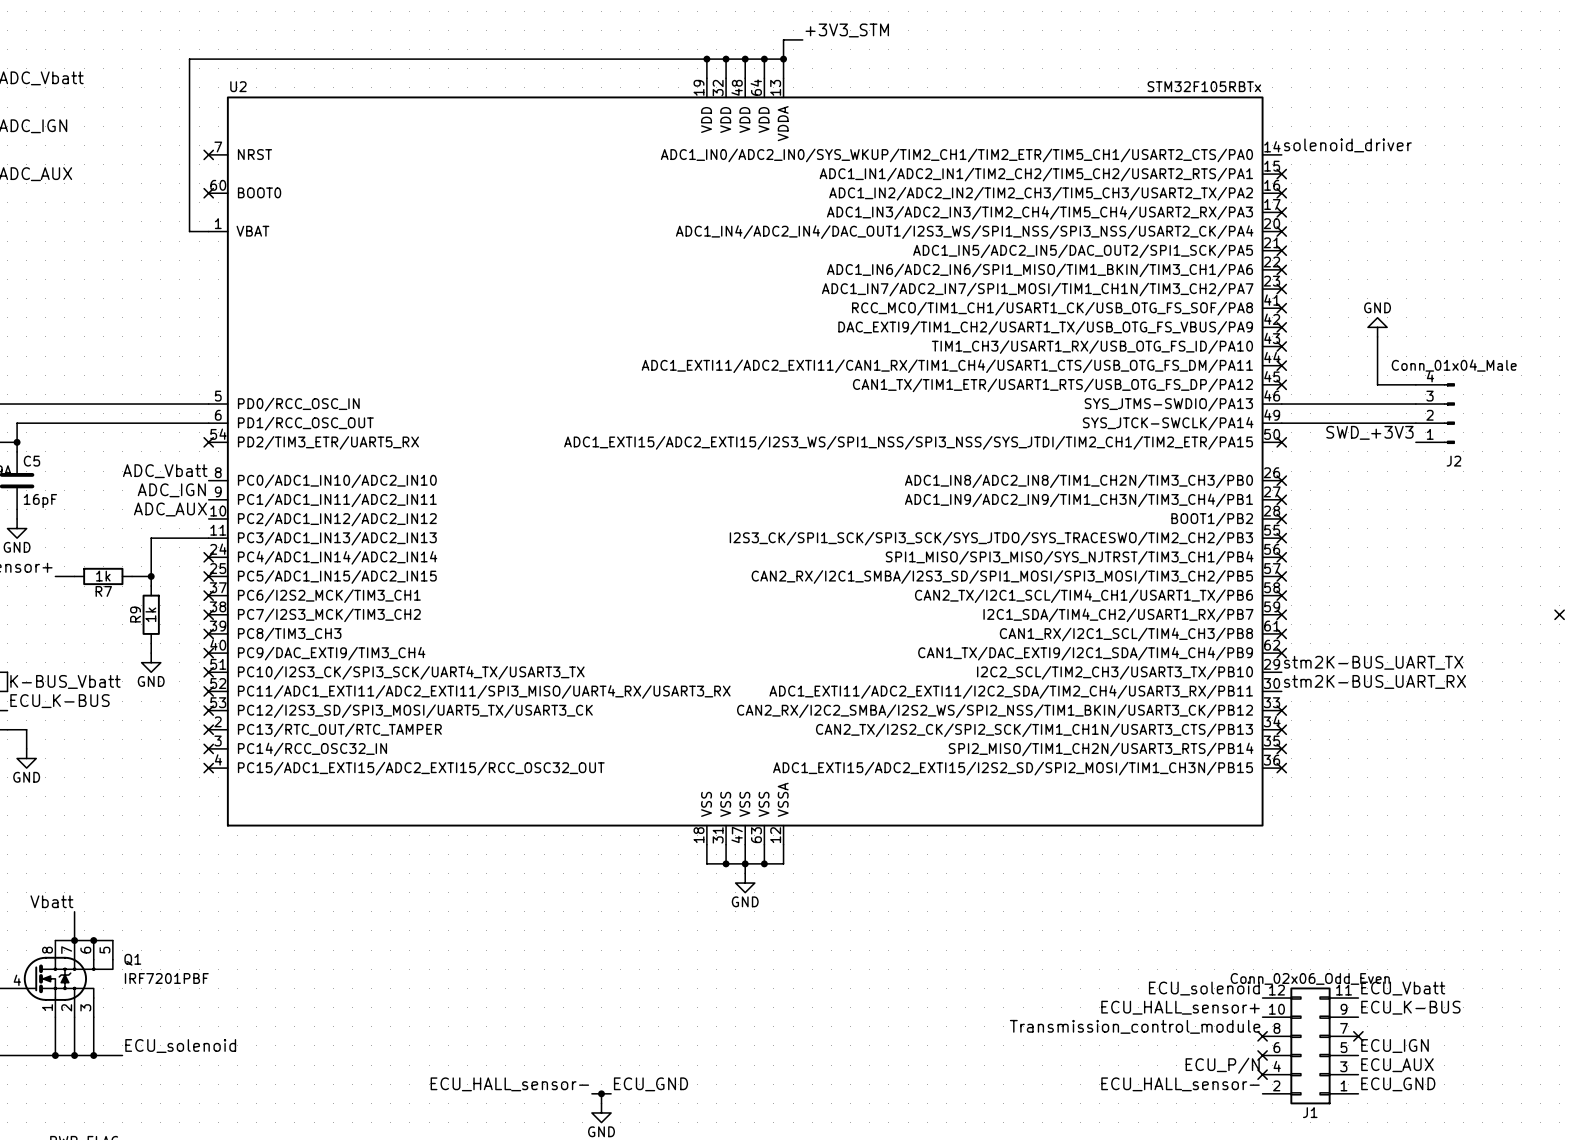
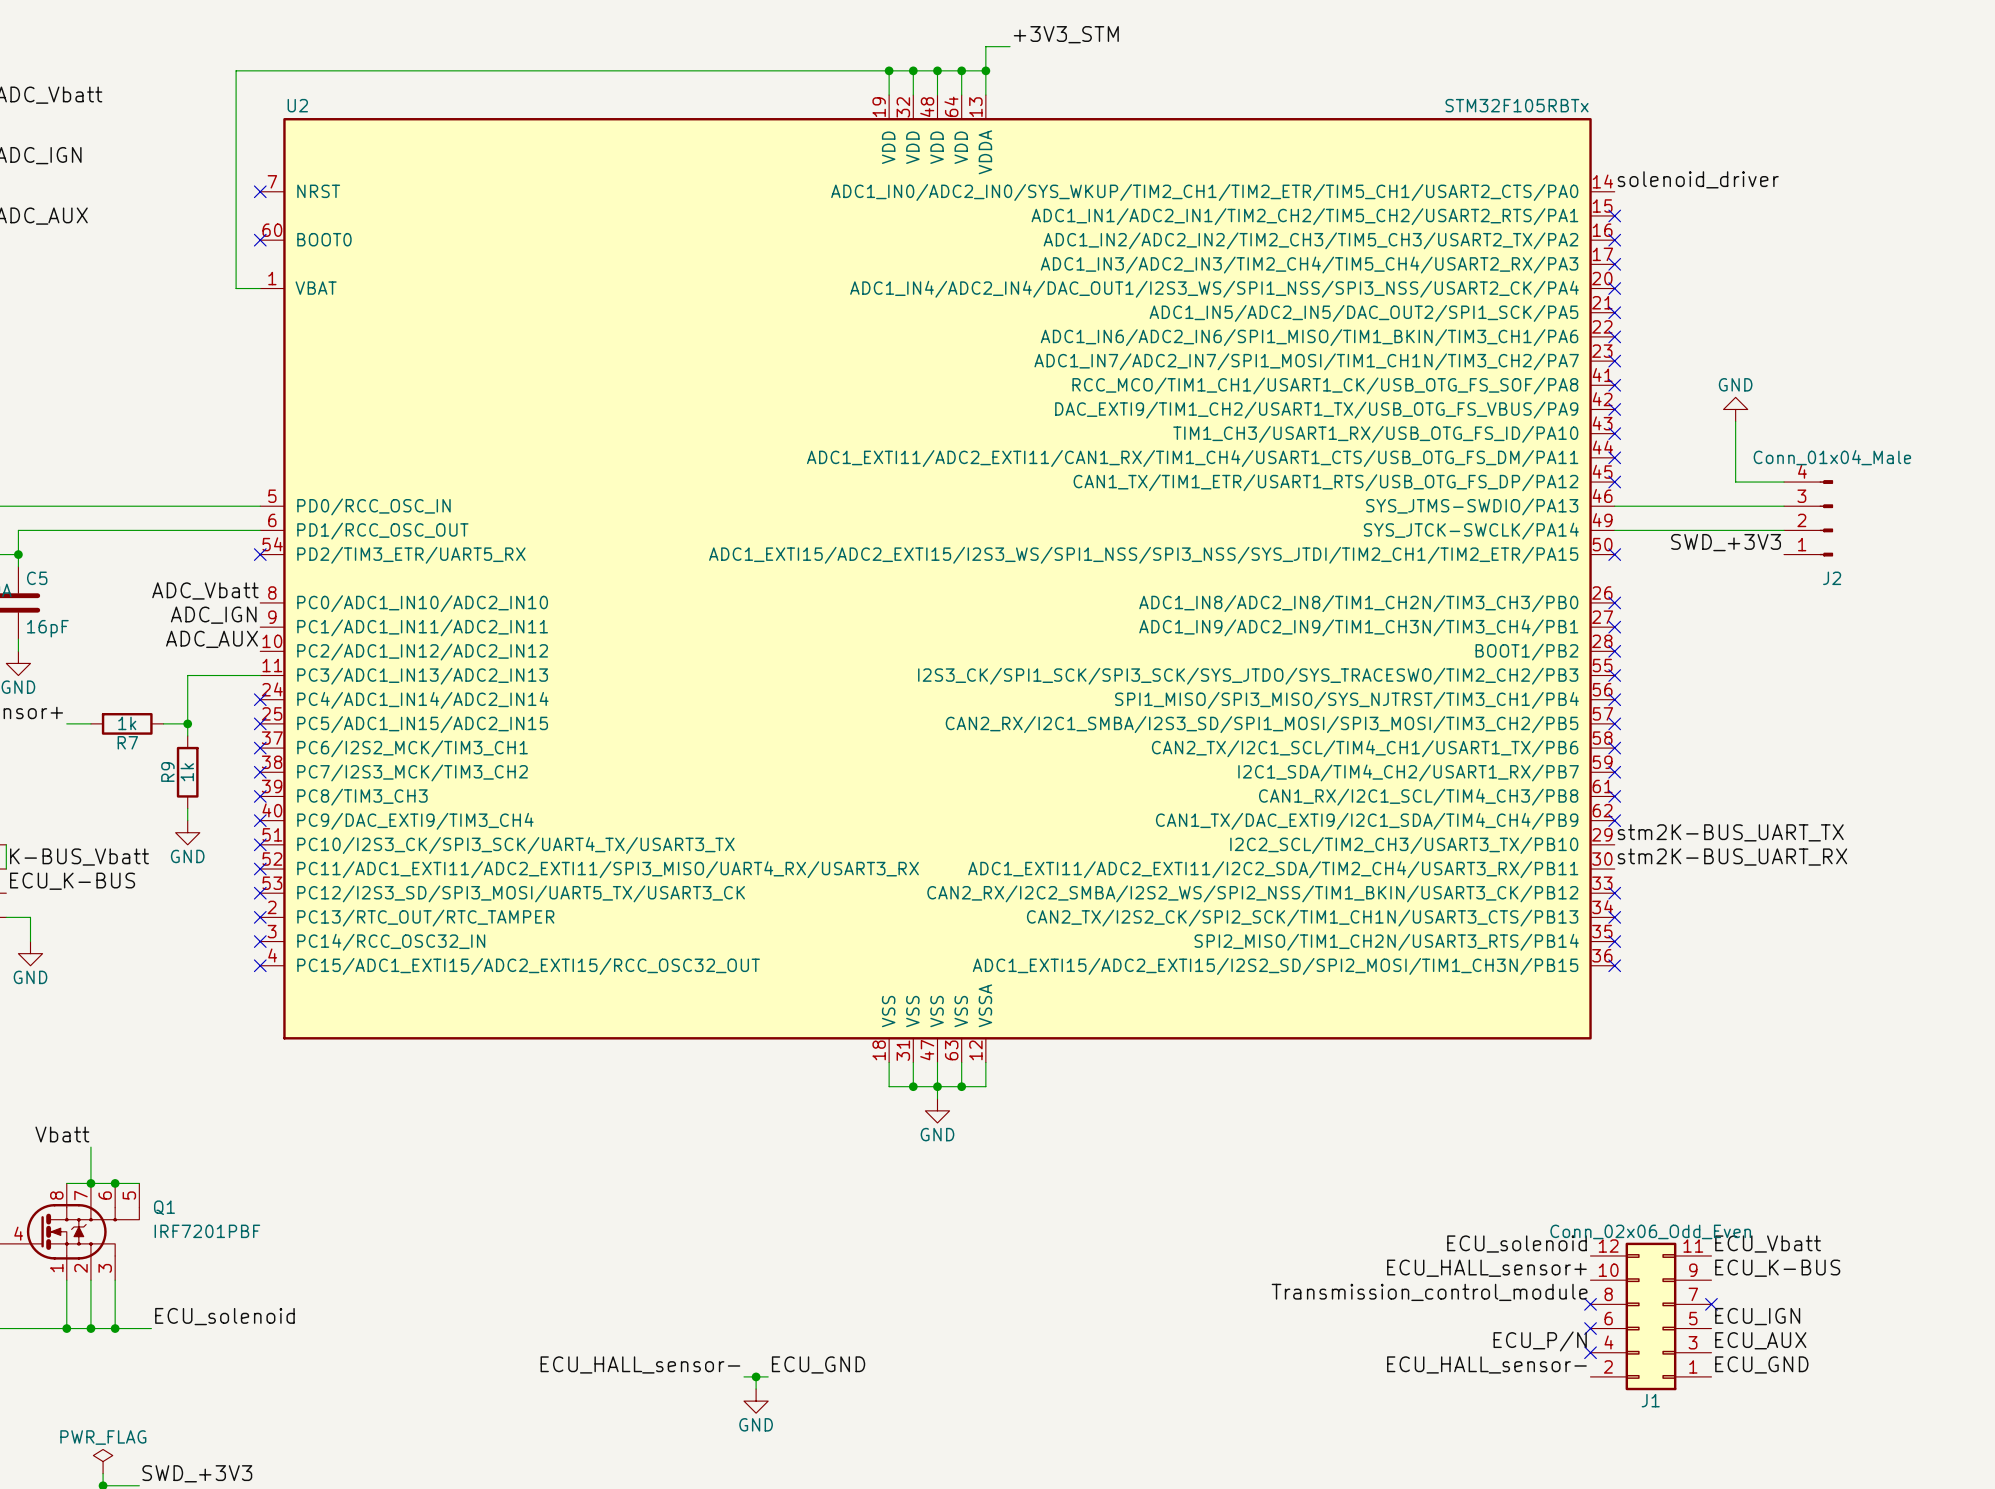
no-connect mark: (1559, 614) -> none

